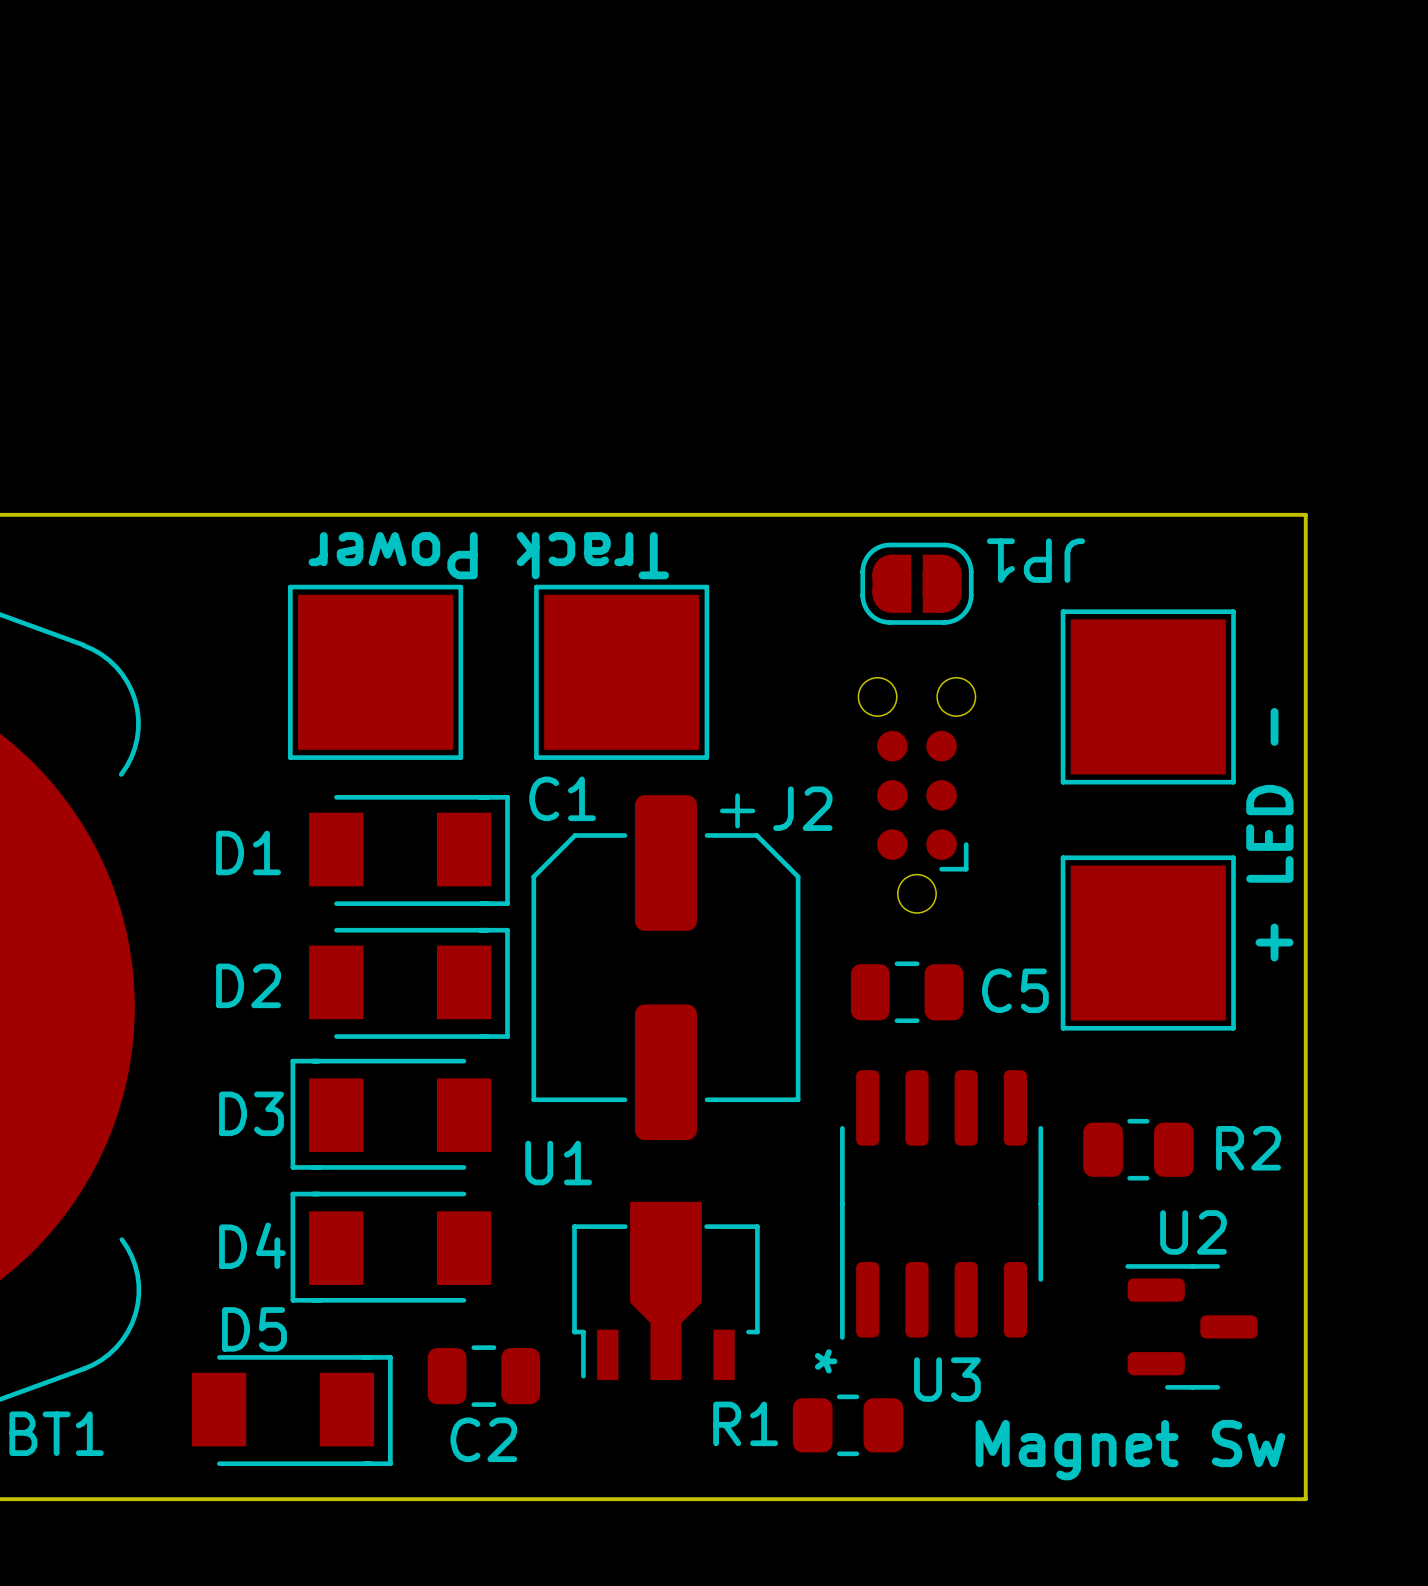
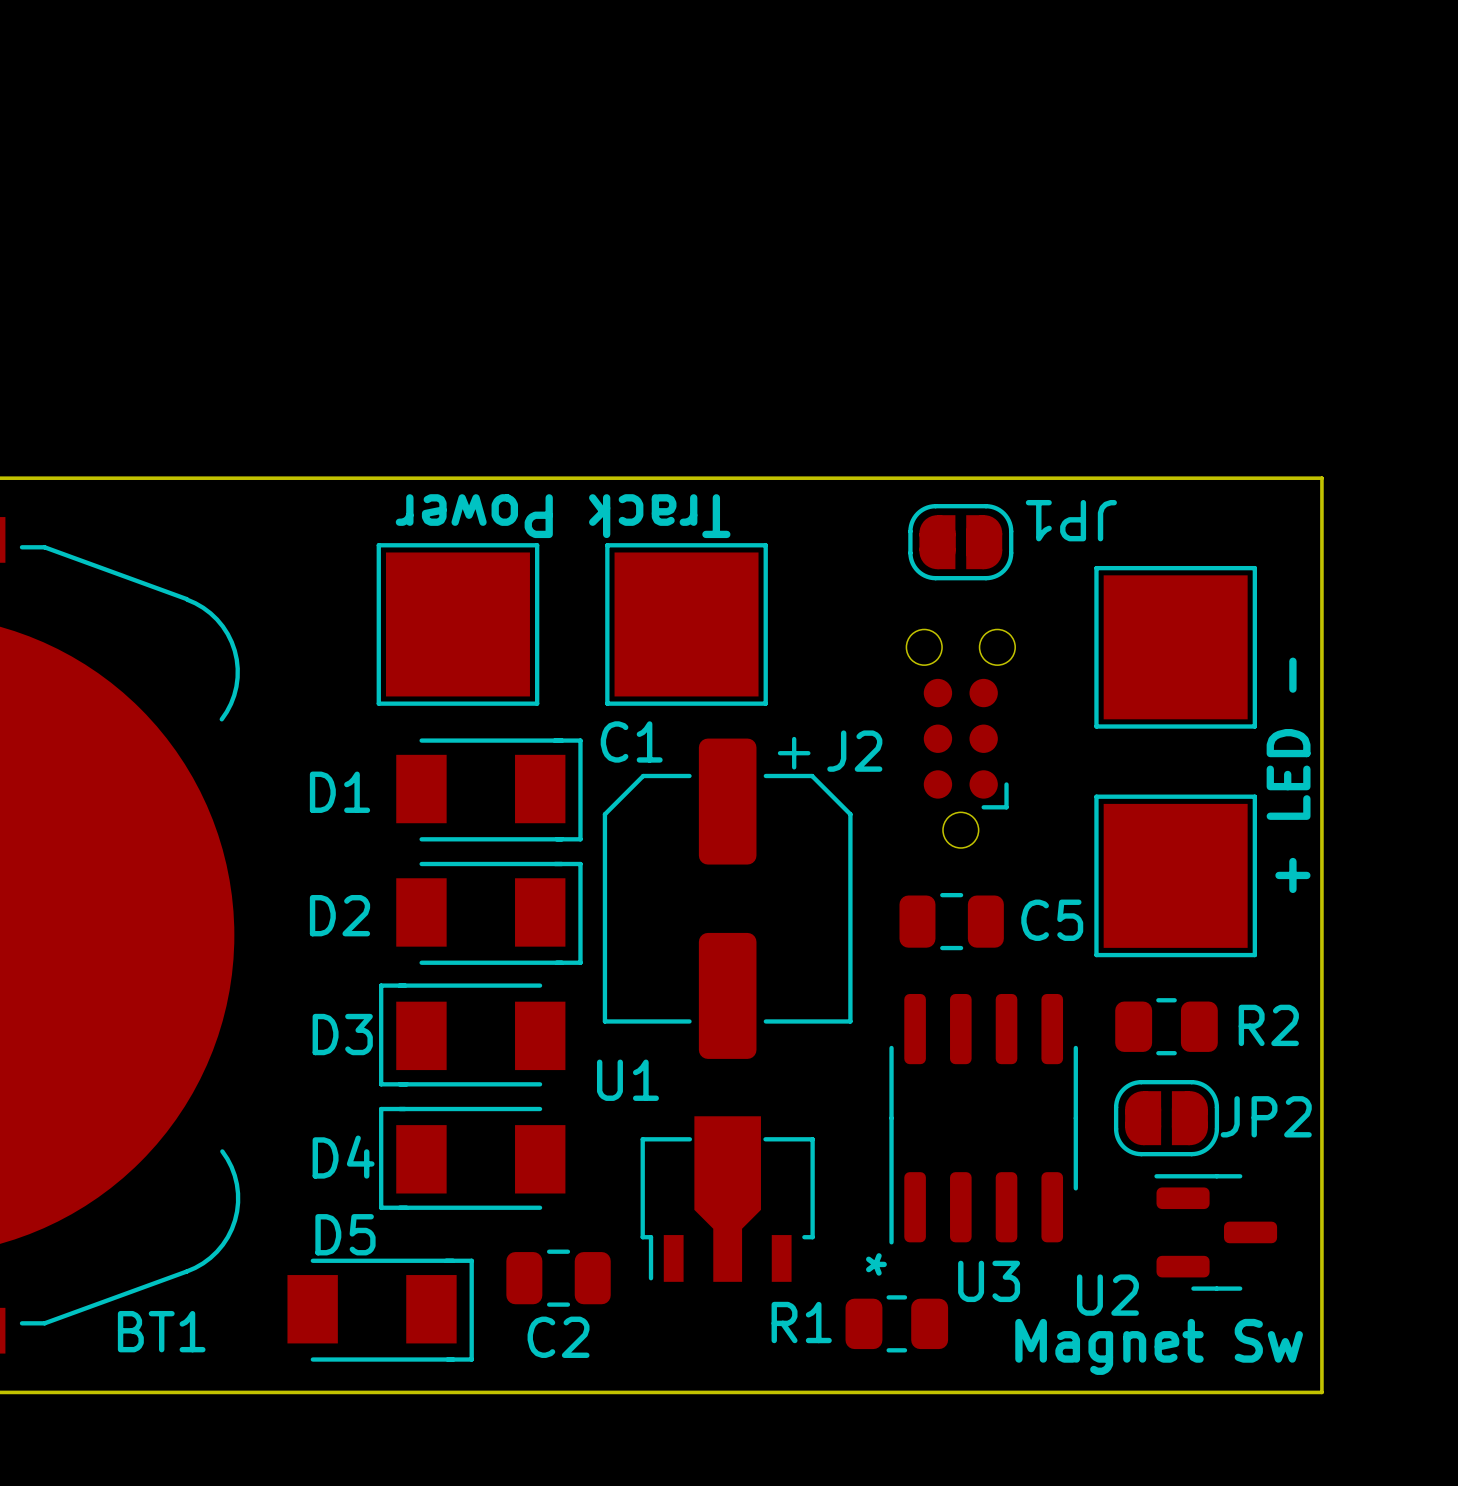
R2 position: (1138, 1149) -> (1166, 1026)
JP2: none -> (1166, 1118)
U2 name position: U2 (1193, 1232) -> U2 (1107, 1295)

